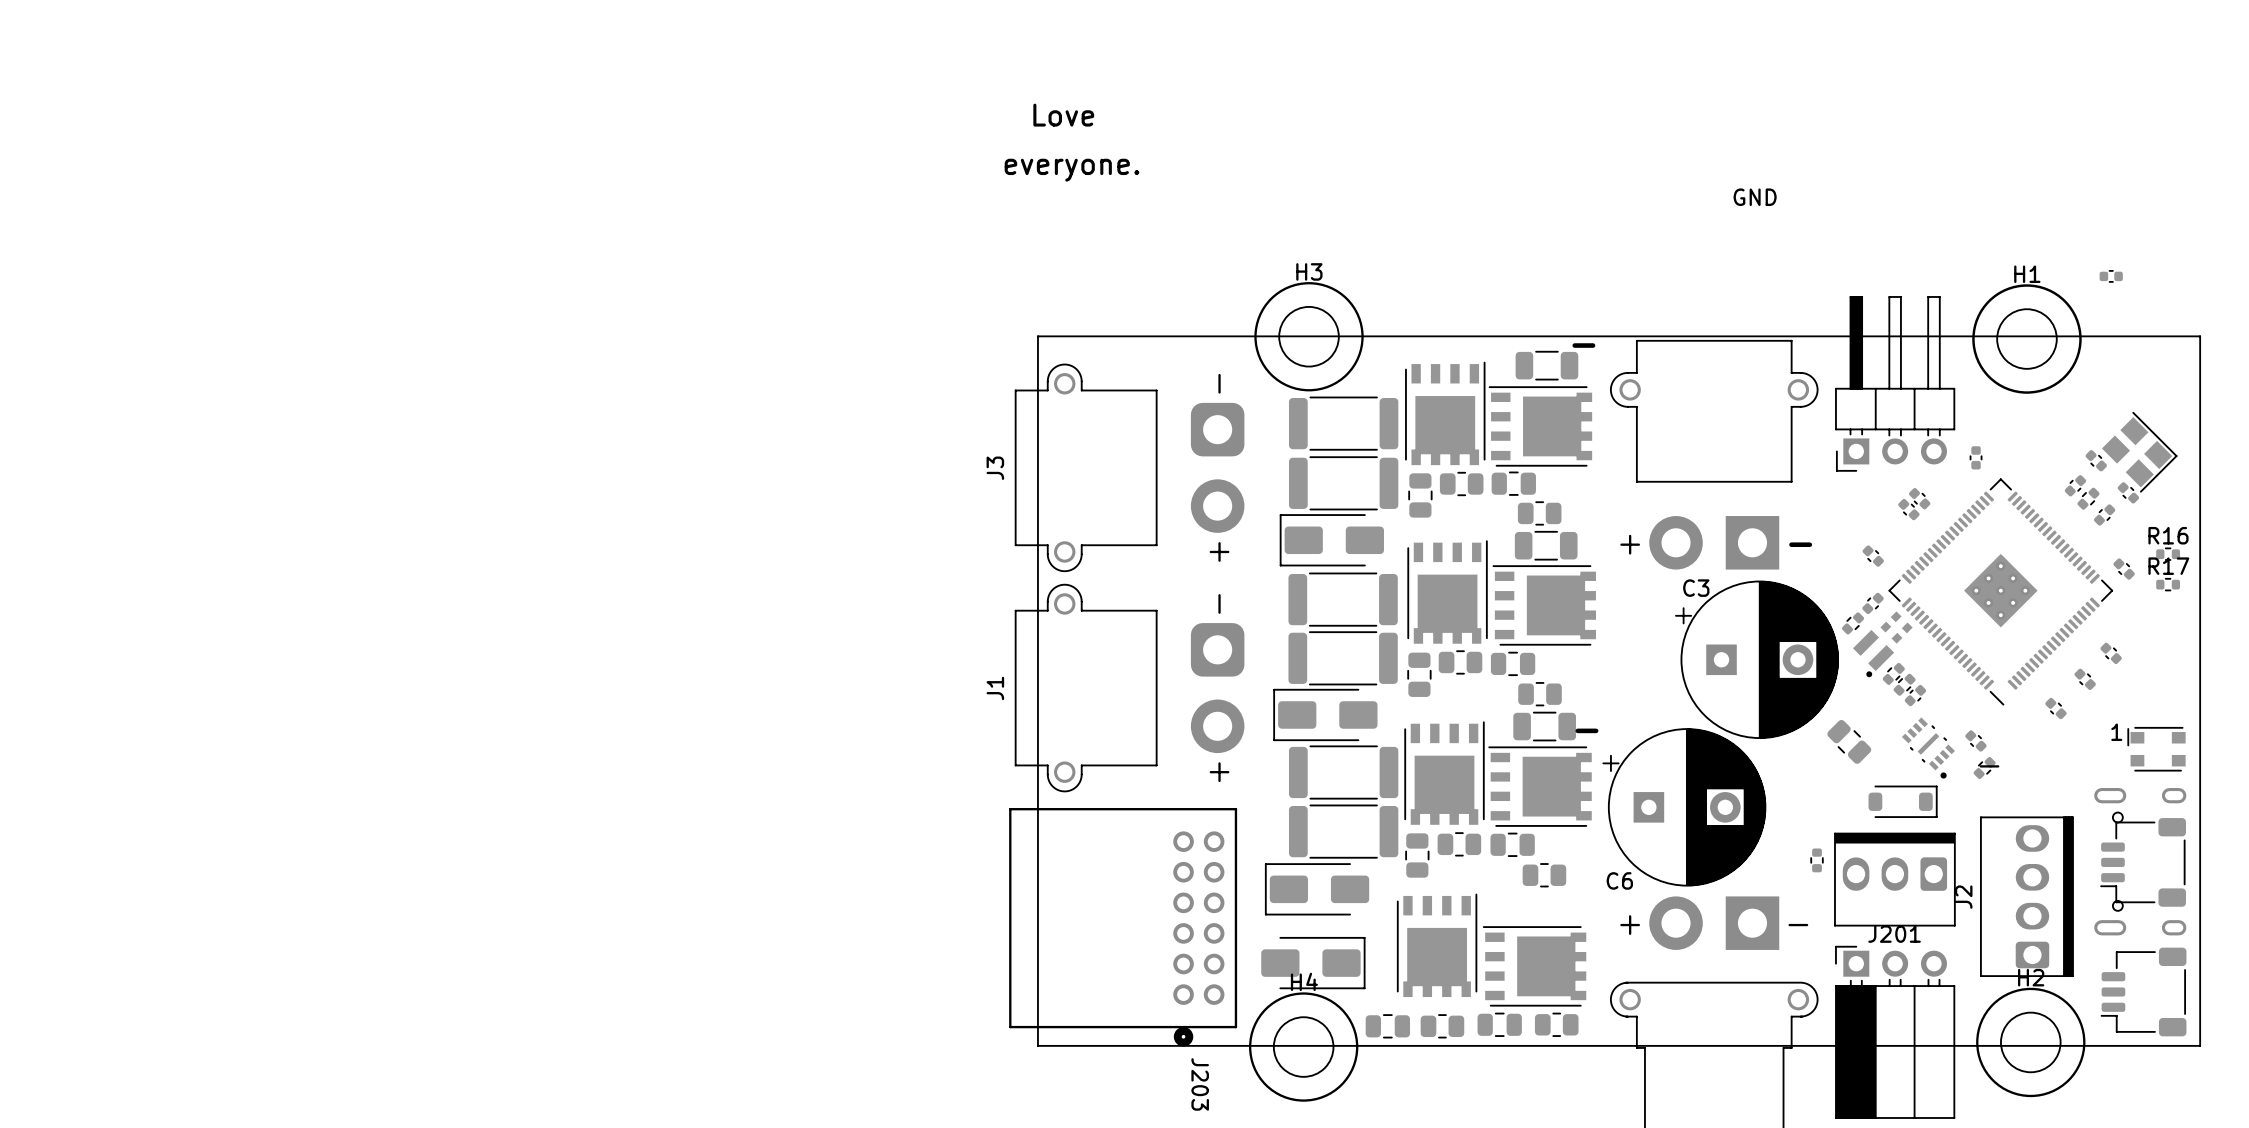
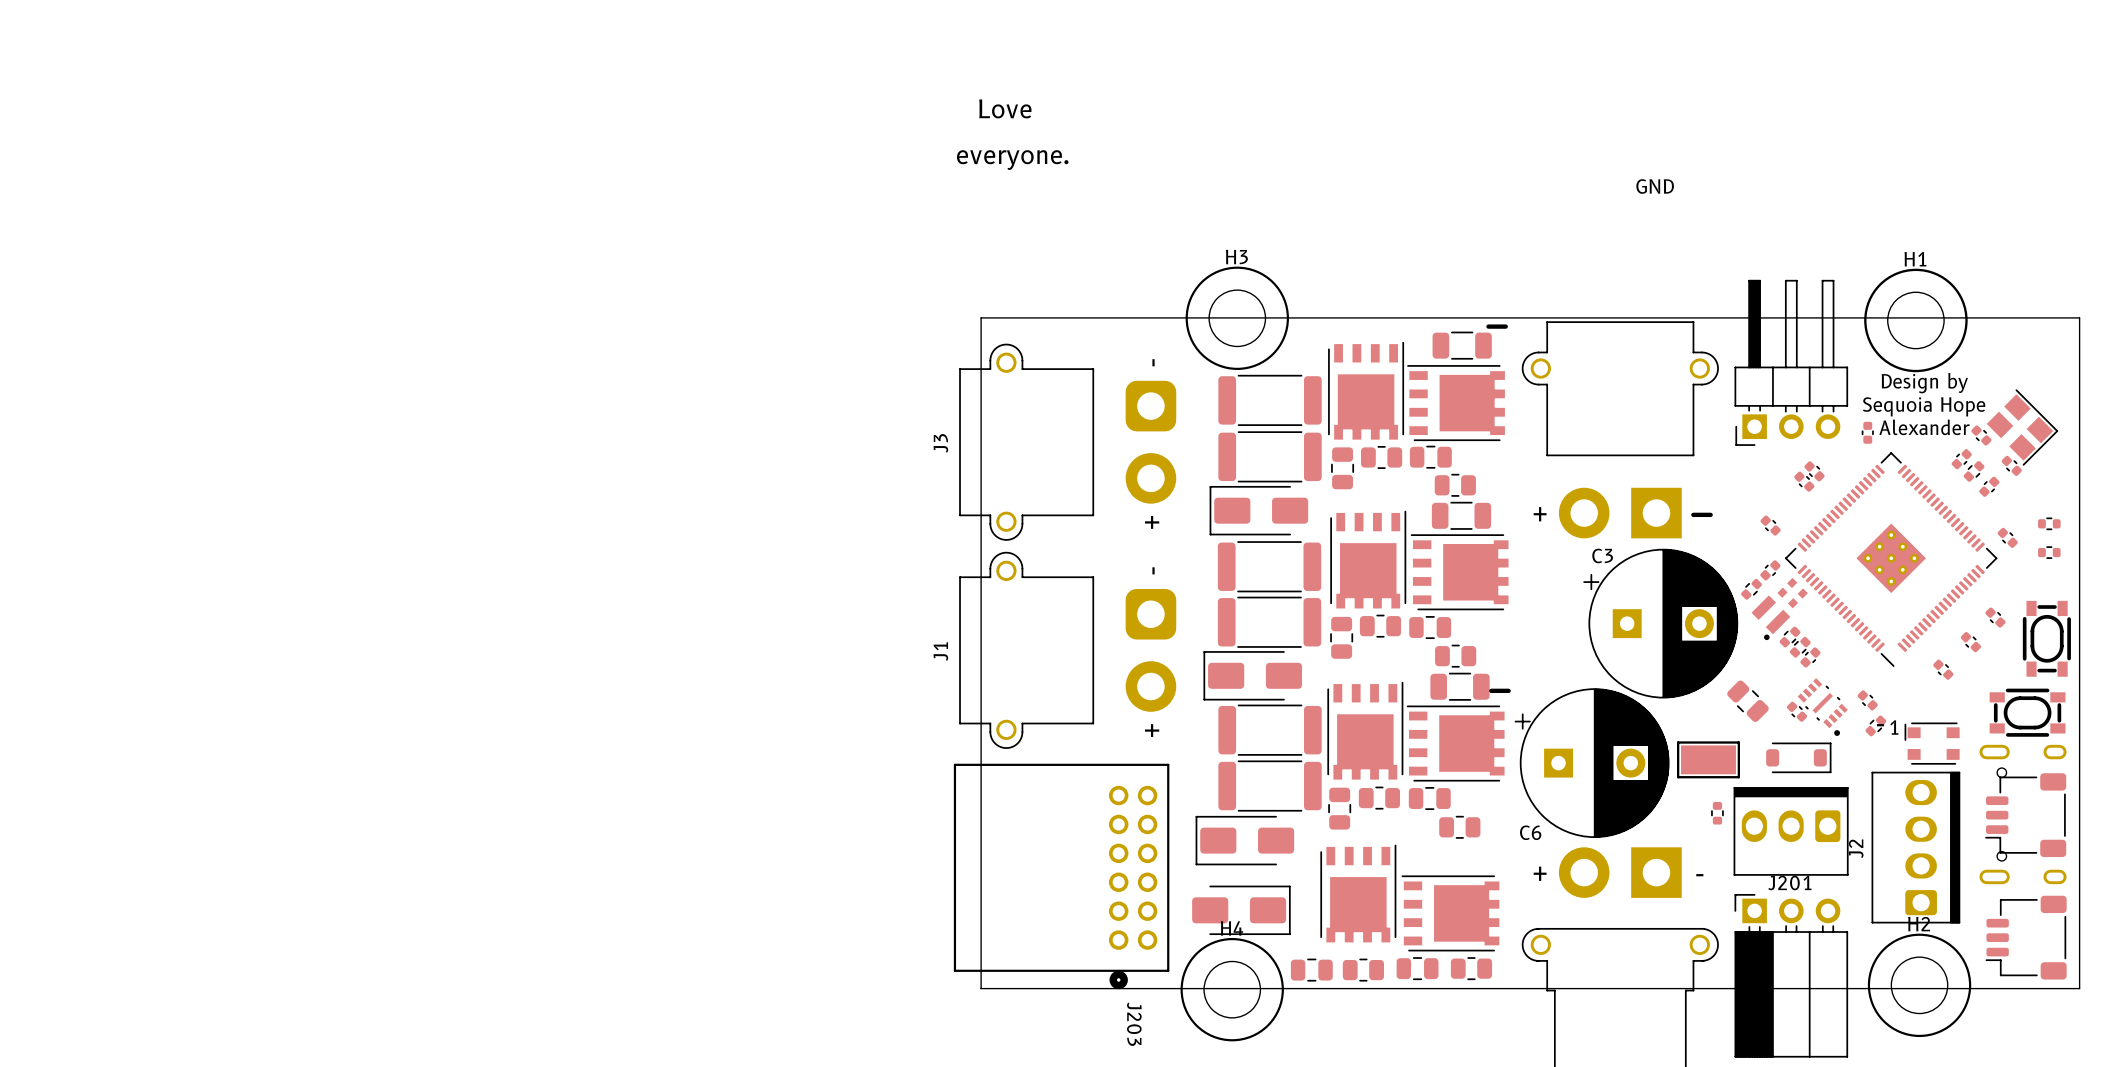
part: (2111, 276) -> none
text: none -> Design by (1924, 383)
text: none -> Sequoia Hope (1924, 406)
text: none -> Alexander (1924, 427)
R16 name: R16 (2168, 535) -> none
R17 name: R17 (2168, 566) -> none
part: none -> (2046, 638)
part footprint: [2127, 726, 2186, 772] -> [1989, 688, 2066, 737]
part: none -> (1797, 711)
part: none -> (1932, 743)
part: none -> (1708, 759)

